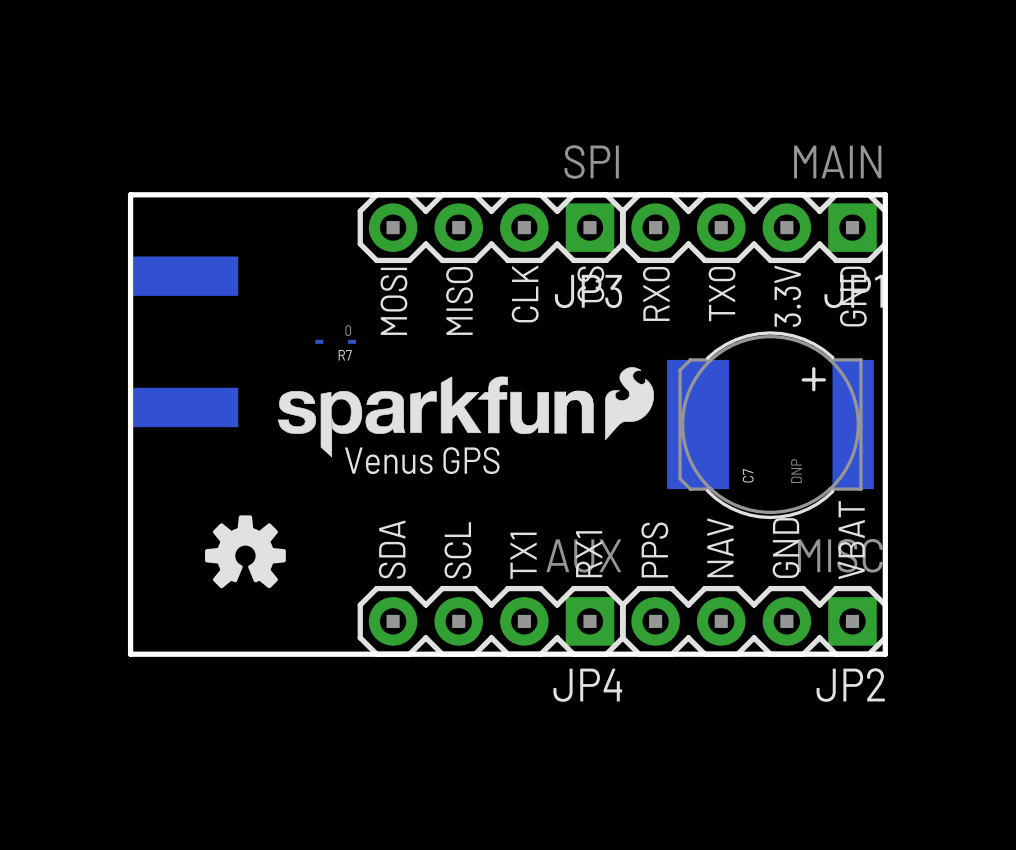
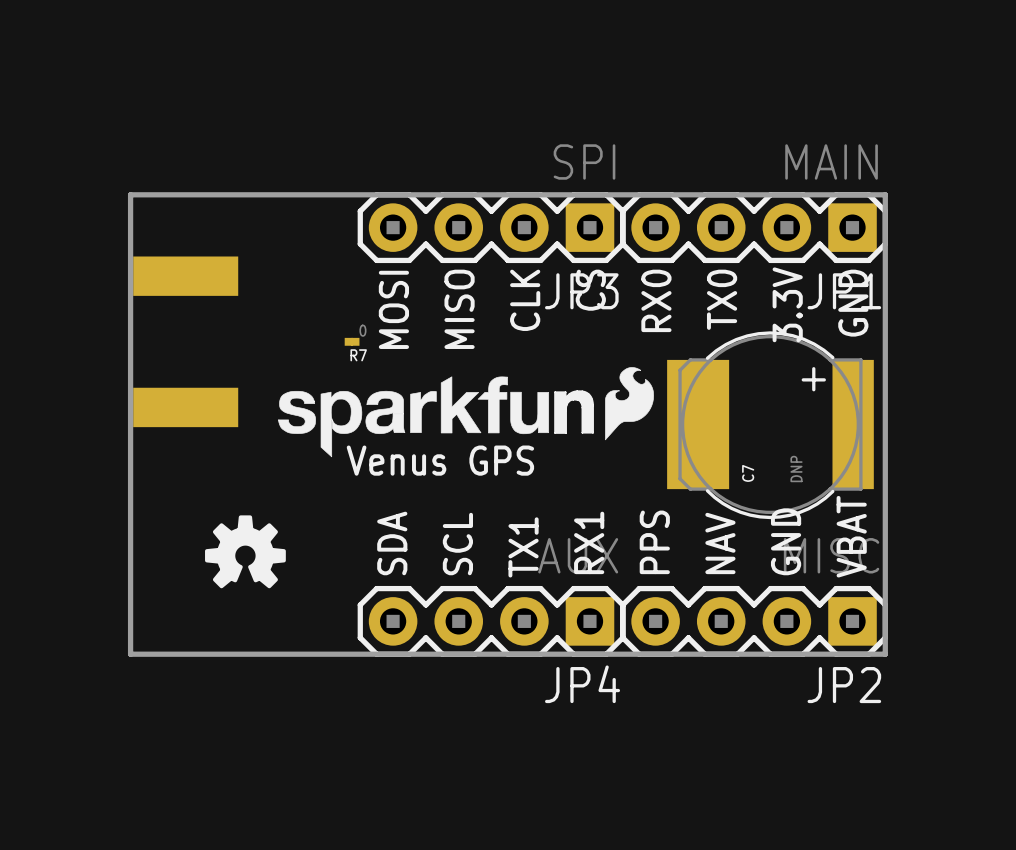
R7 footprint: [315, 339, 357, 344] -> [344, 337, 360, 346]

